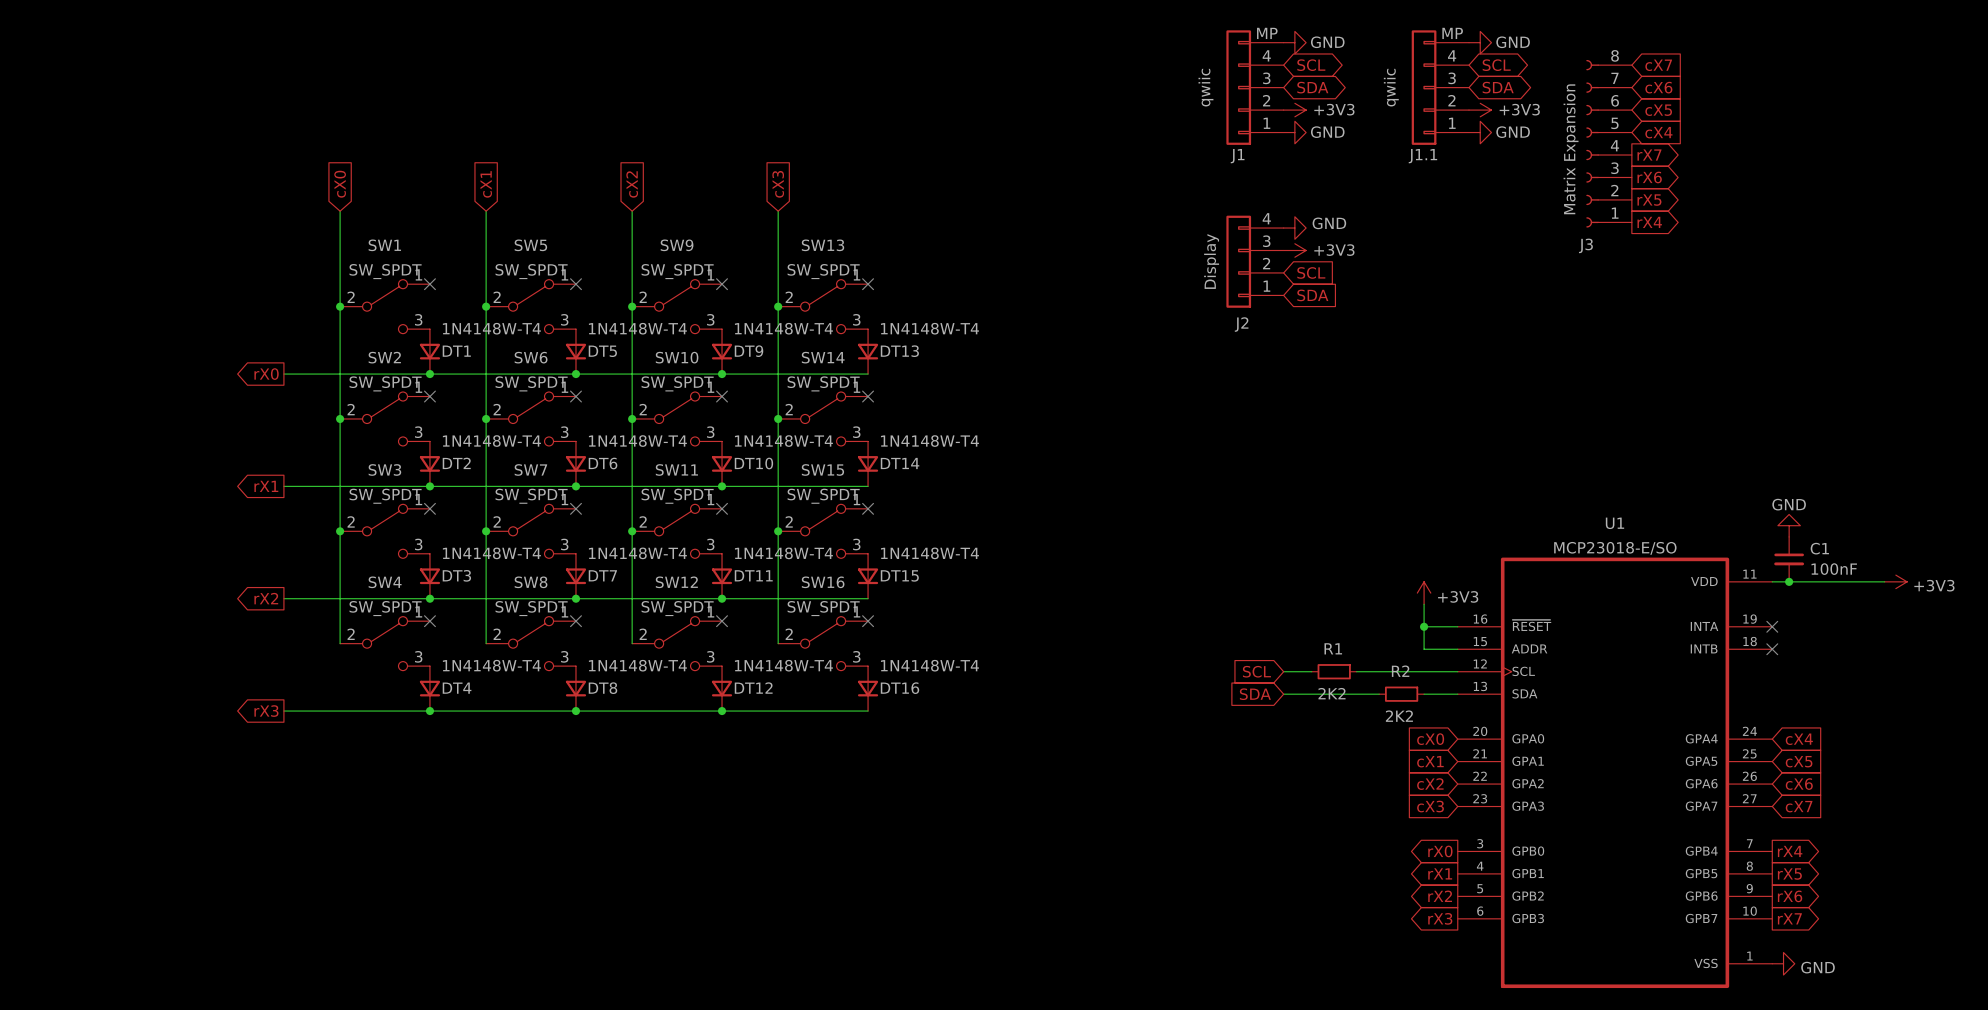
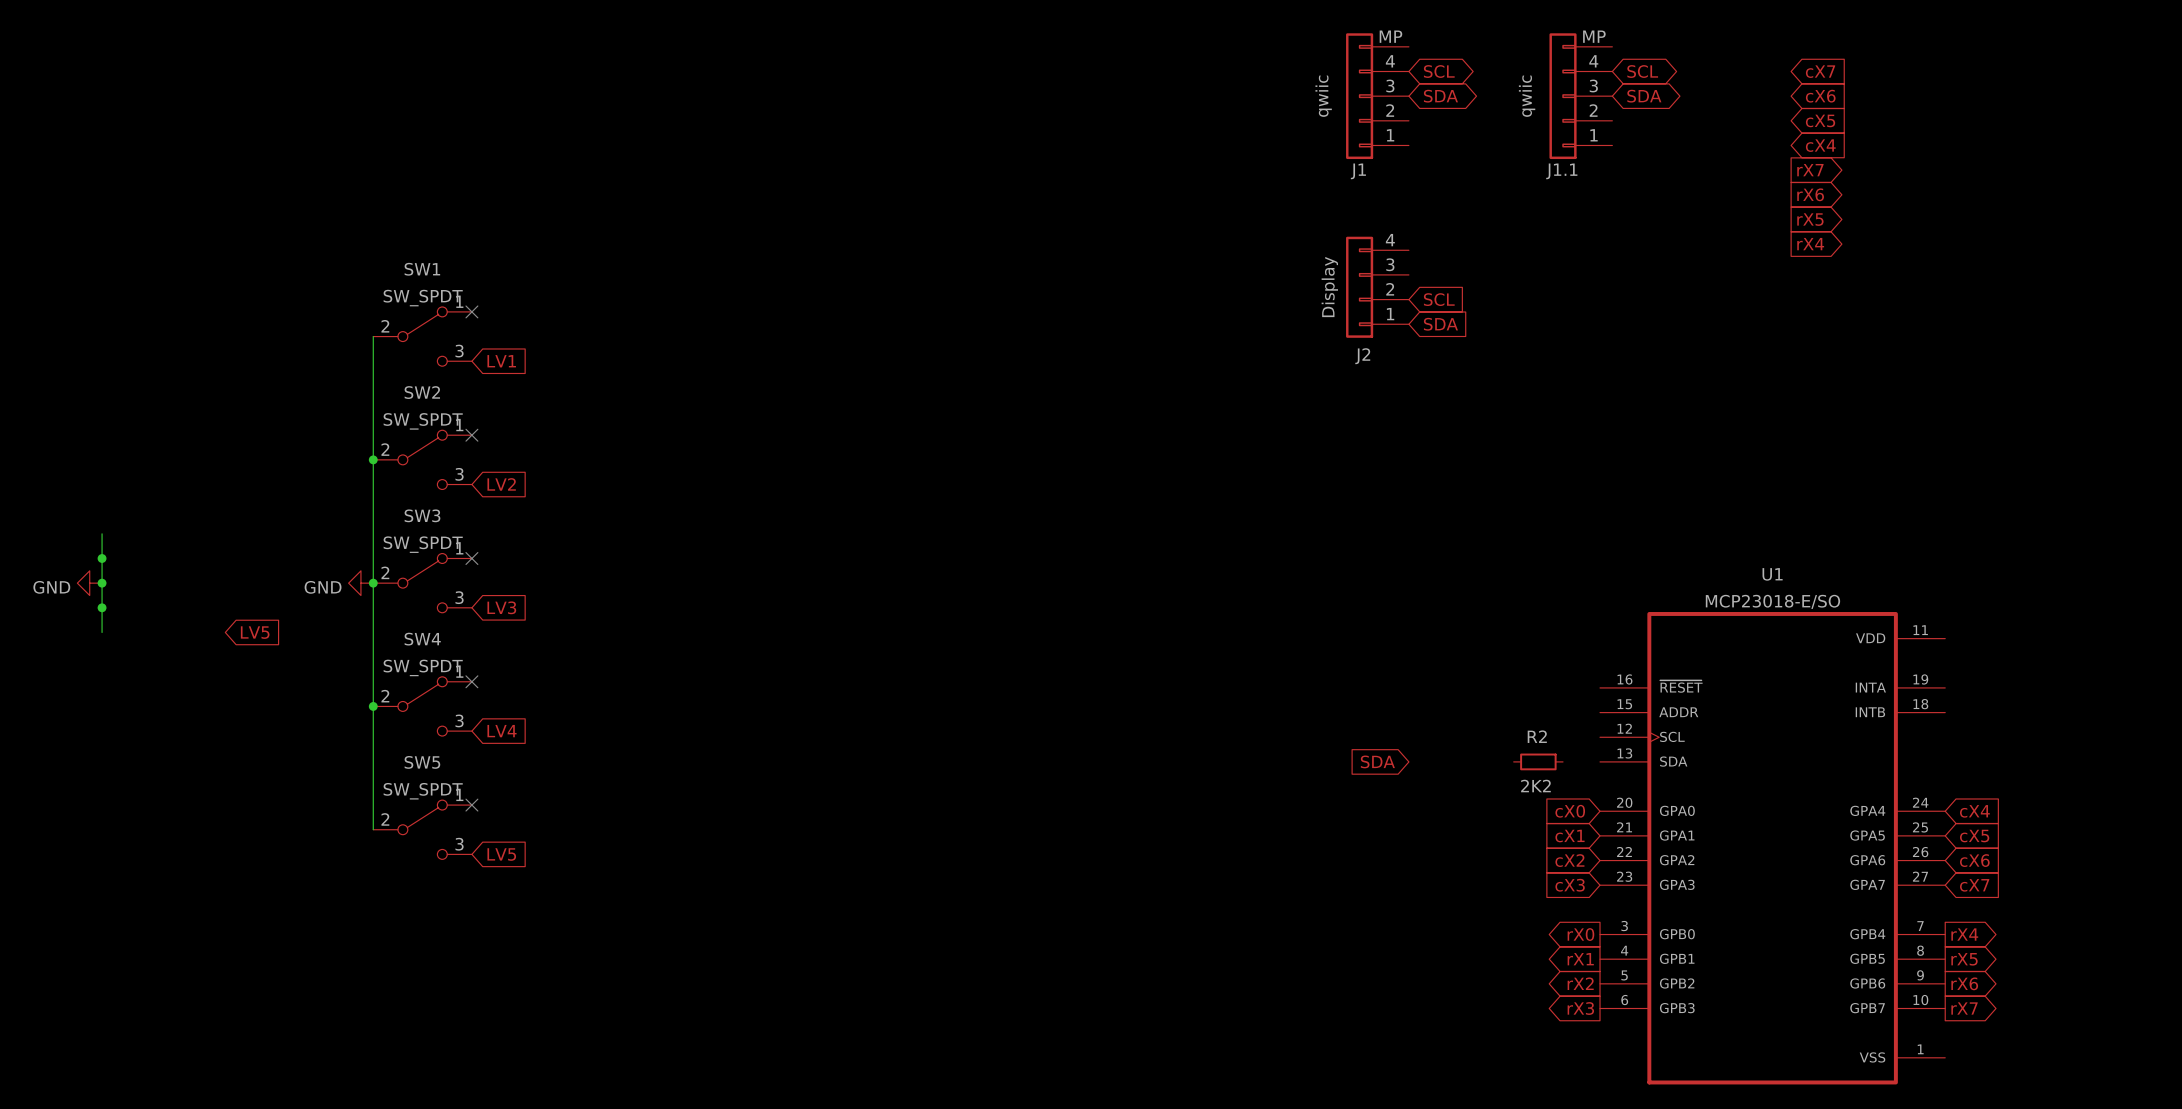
power symbol: GND (1294, 42) -> none
power symbol: GND (1480, 42) -> none
power symbol: +3V3 (1294, 110) -> none
power symbol: +3V3 (1480, 110) -> none
power symbol: GND (1294, 132) -> none
power symbol: GND (1480, 132) -> none
J3: Matrix Expansion (1609, 143) -> none
global label: cX0 (340, 184) -> none
global label: cX1 (486, 184) -> none
global label: cX2 (632, 184) -> none
global label: cX3 (778, 184) -> none
wire: (340, 211) (340, 306) -> none
wire: (486, 211) (486, 643) -> none
wire: (632, 211) (632, 643) -> none
wire: (778, 211) (778, 643) -> none
power symbol: GND (1294, 228) -> none
power symbol: +3V3 (1294, 250) -> none
no-connect mark: (575, 284) -> none
no-connect mark: (722, 284) -> none
no-connect mark: (868, 284) -> none
junction: (340, 306) -> none
junction: (486, 306) -> none
SW5 position: (531, 306) -> (422, 829)
junction: (632, 306) -> none
SW9: SW_SPDT (677, 306) -> none
junction: (778, 306) -> none
SW13: SW_SPDT (823, 306) -> none
global label: none -> LV1 (501, 361)
DT1: 1N4148W-T4 (429, 351) -> none
DT5: 1N4148W-T4 (575, 351) -> none
DT9: 1N4148W-T4 (722, 351) -> none
DT13: 1N4148W-T4 (868, 351) -> none
global label: rX0 (266, 374) -> none
wire: (283, 374) (868, 374) -> none
junction: (429, 374) -> none
junction: (575, 374) -> none
junction: (722, 374) -> none
no-connect mark: (575, 396) -> none
no-connect mark: (722, 396) -> none
no-connect mark: (868, 396) -> none
junction: (486, 418) -> none
SW6: SW_SPDT (531, 418) -> none
junction: (632, 418) -> none
SW10: SW_SPDT (677, 418) -> none
junction: (778, 418) -> none
SW14: SW_SPDT (823, 418) -> none
global label: none -> LV2 (501, 484)
DT2: 1N4148W-T4 (429, 463) -> none
DT6: 1N4148W-T4 (575, 463) -> none
DT10: 1N4148W-T4 (722, 463) -> none
DT14: 1N4148W-T4 (868, 463) -> none
wire: none -> (102, 533) (102, 632)
global label: rX1 (266, 486) -> none
wire: (283, 486) (868, 486) -> none
junction: (429, 486) -> none
junction: (575, 486) -> none
junction: (722, 486) -> none
junction: none -> (102, 558)
no-connect mark: (575, 508) -> none
no-connect mark: (722, 508) -> none
no-connect mark: (868, 508) -> none
power symbol: GND (1789, 525) -> none
power symbol: none -> GND (89, 583)
junction: none -> (102, 583)
power symbol: none -> GND (360, 583)
junction: (486, 531) -> none
SW7: SW_SPDT (531, 531) -> none
junction: (632, 531) -> none
SW11: SW_SPDT (677, 531) -> none
junction: (778, 531) -> none
SW15: SW_SPDT (823, 531) -> none
junction: none -> (102, 607)
global label: none -> LV3 (501, 607)
C1: 100nF (1789, 559) -> none
global label: none -> LV5 (255, 632)
DT3: 1N4148W-T4 (429, 576) -> none
DT7: 1N4148W-T4 (575, 576) -> none
DT11: 1N4148W-T4 (722, 576) -> none
DT15: 1N4148W-T4 (868, 576) -> none
wire: (1772, 581) (1884, 581) -> none
junction: (1789, 581) -> none
power symbol: +3V3 (1895, 581) -> none
power symbol: +3V3 (1424, 593) -> none
global label: rX2 (266, 598) -> none
wire: (283, 598) (868, 598) -> none
junction: (429, 598) -> none
junction: (575, 598) -> none
junction: (722, 598) -> none
wire: (1424, 604) (1424, 649) (1457, 649) -> none
no-connect mark: (575, 621) -> none
no-connect mark: (722, 621) -> none
no-connect mark: (868, 621) -> none
wire: (1424, 626) (1457, 626) -> none
junction: (1424, 626) -> none
no-connect mark: (1772, 626) -> none
wire: none -> (373, 706) (373, 829)
junction: none -> (373, 706)
SW8: SW_SPDT (531, 643) -> none
SW12: SW_SPDT (677, 643) -> none
SW16: SW_SPDT (823, 643) -> none
no-connect mark: (1772, 649) -> none
global label: none -> LV4 (502, 731)
global label: SCL (1256, 671) -> none
wire: (1283, 671) (1311, 671) -> none
R1: 2K2 (1334, 671) -> none
wire: (1356, 671) (1457, 671) -> none
DT4: 1N4148W-T4 (429, 688) -> none
DT8: 1N4148W-T4 (575, 688) -> none
DT12: 1N4148W-T4 (722, 688) -> none
DT16: 1N4148W-T4 (868, 688) -> none
wire: (1283, 694) (1379, 694) -> none
wire: (1424, 694) (1457, 694) -> none
global label: rX3 (266, 711) -> none
wire: (283, 711) (868, 711) -> none
junction: (429, 711) -> none
junction: (575, 711) -> none
junction: (722, 711) -> none
no-connect mark: none -> (471, 805)
global label: none -> LV5 (501, 854)
power symbol: GND (1783, 963) -> none

